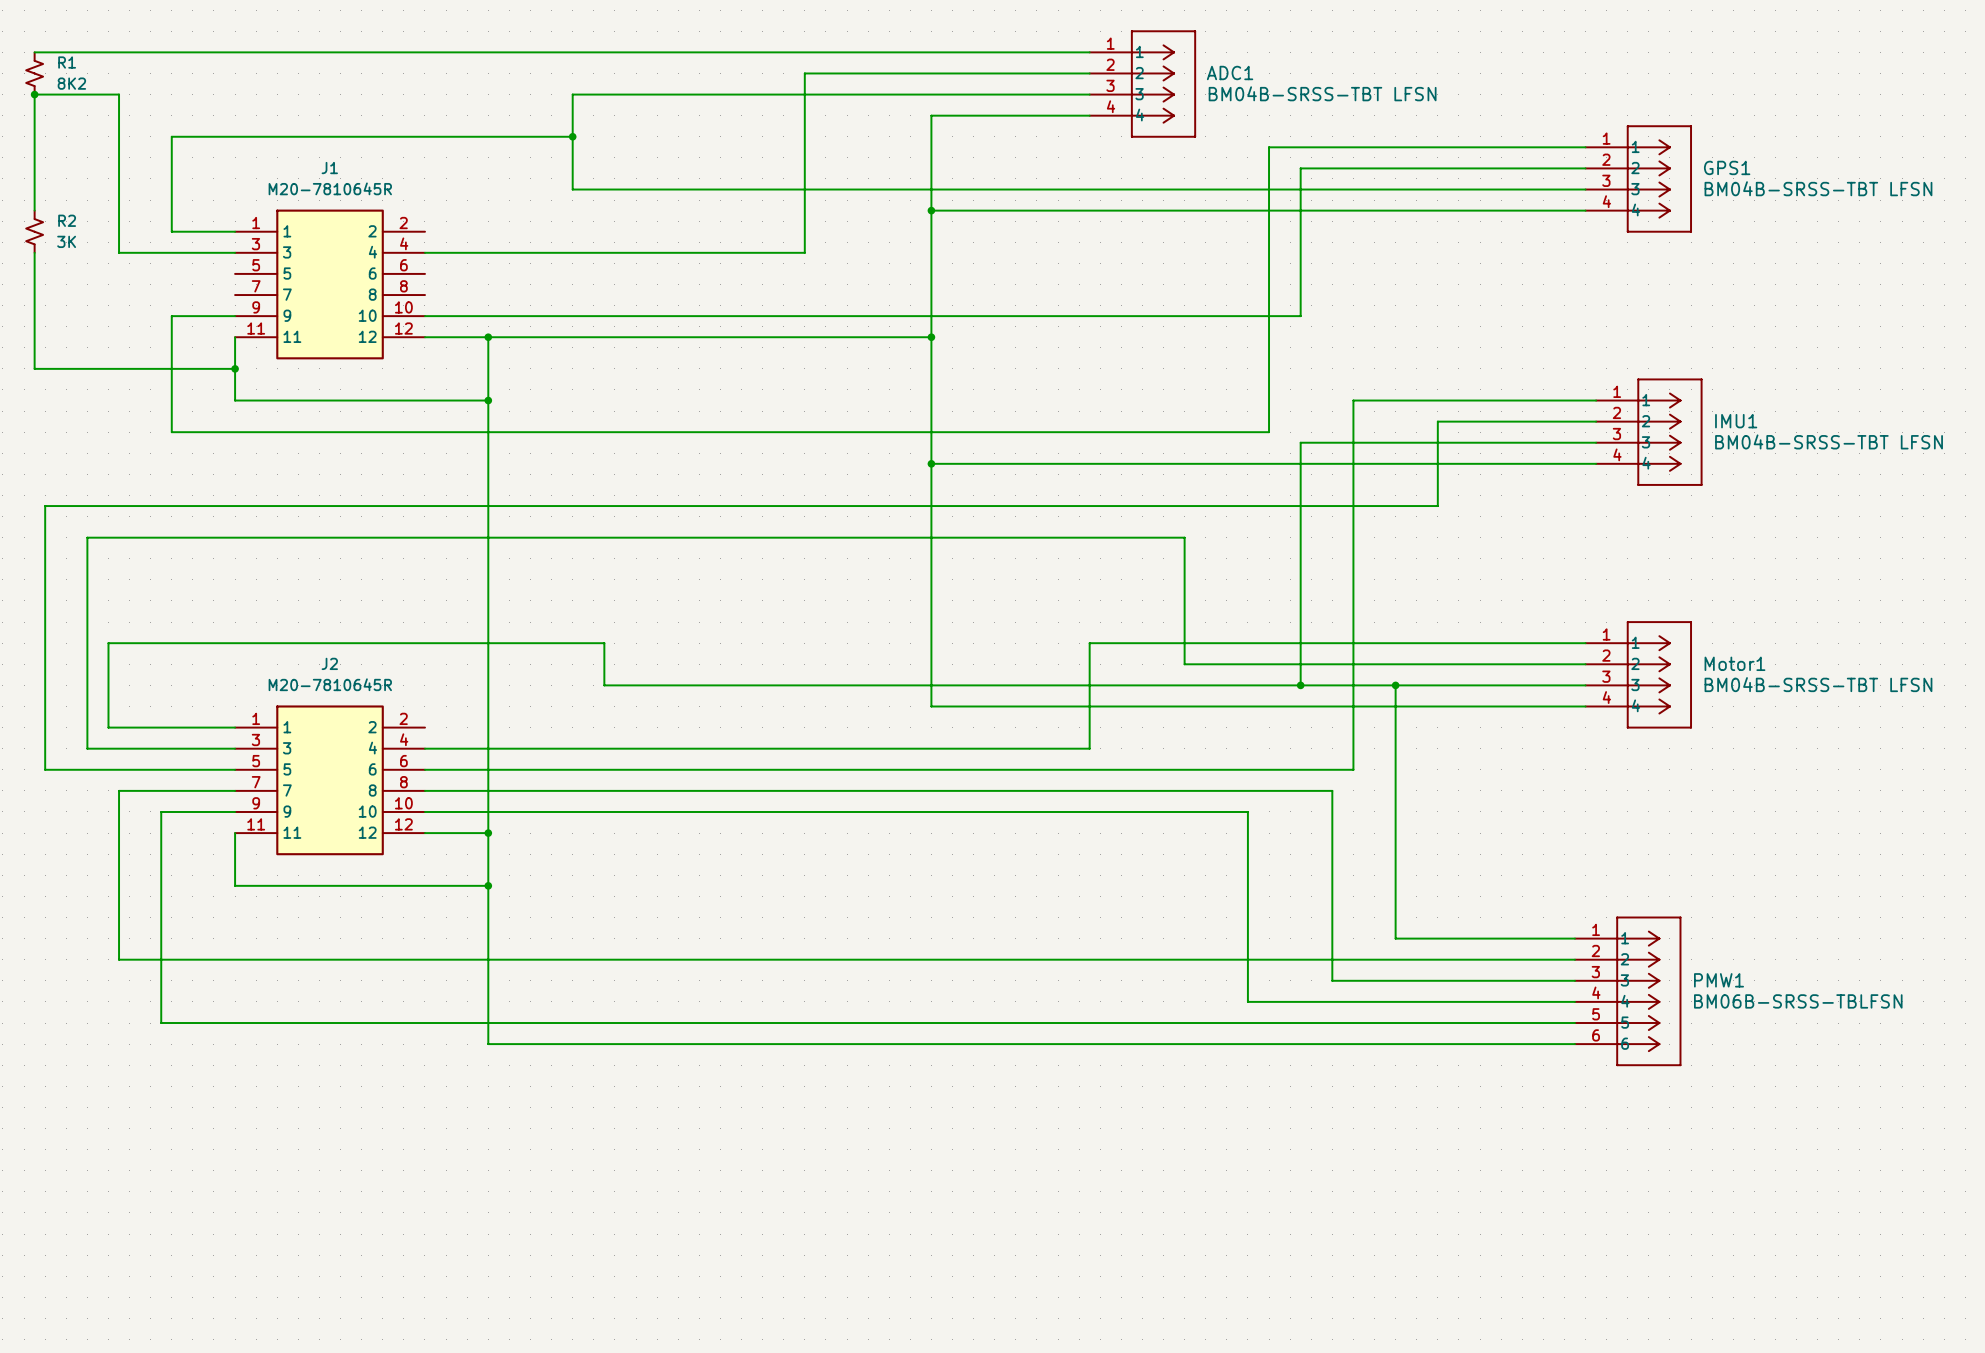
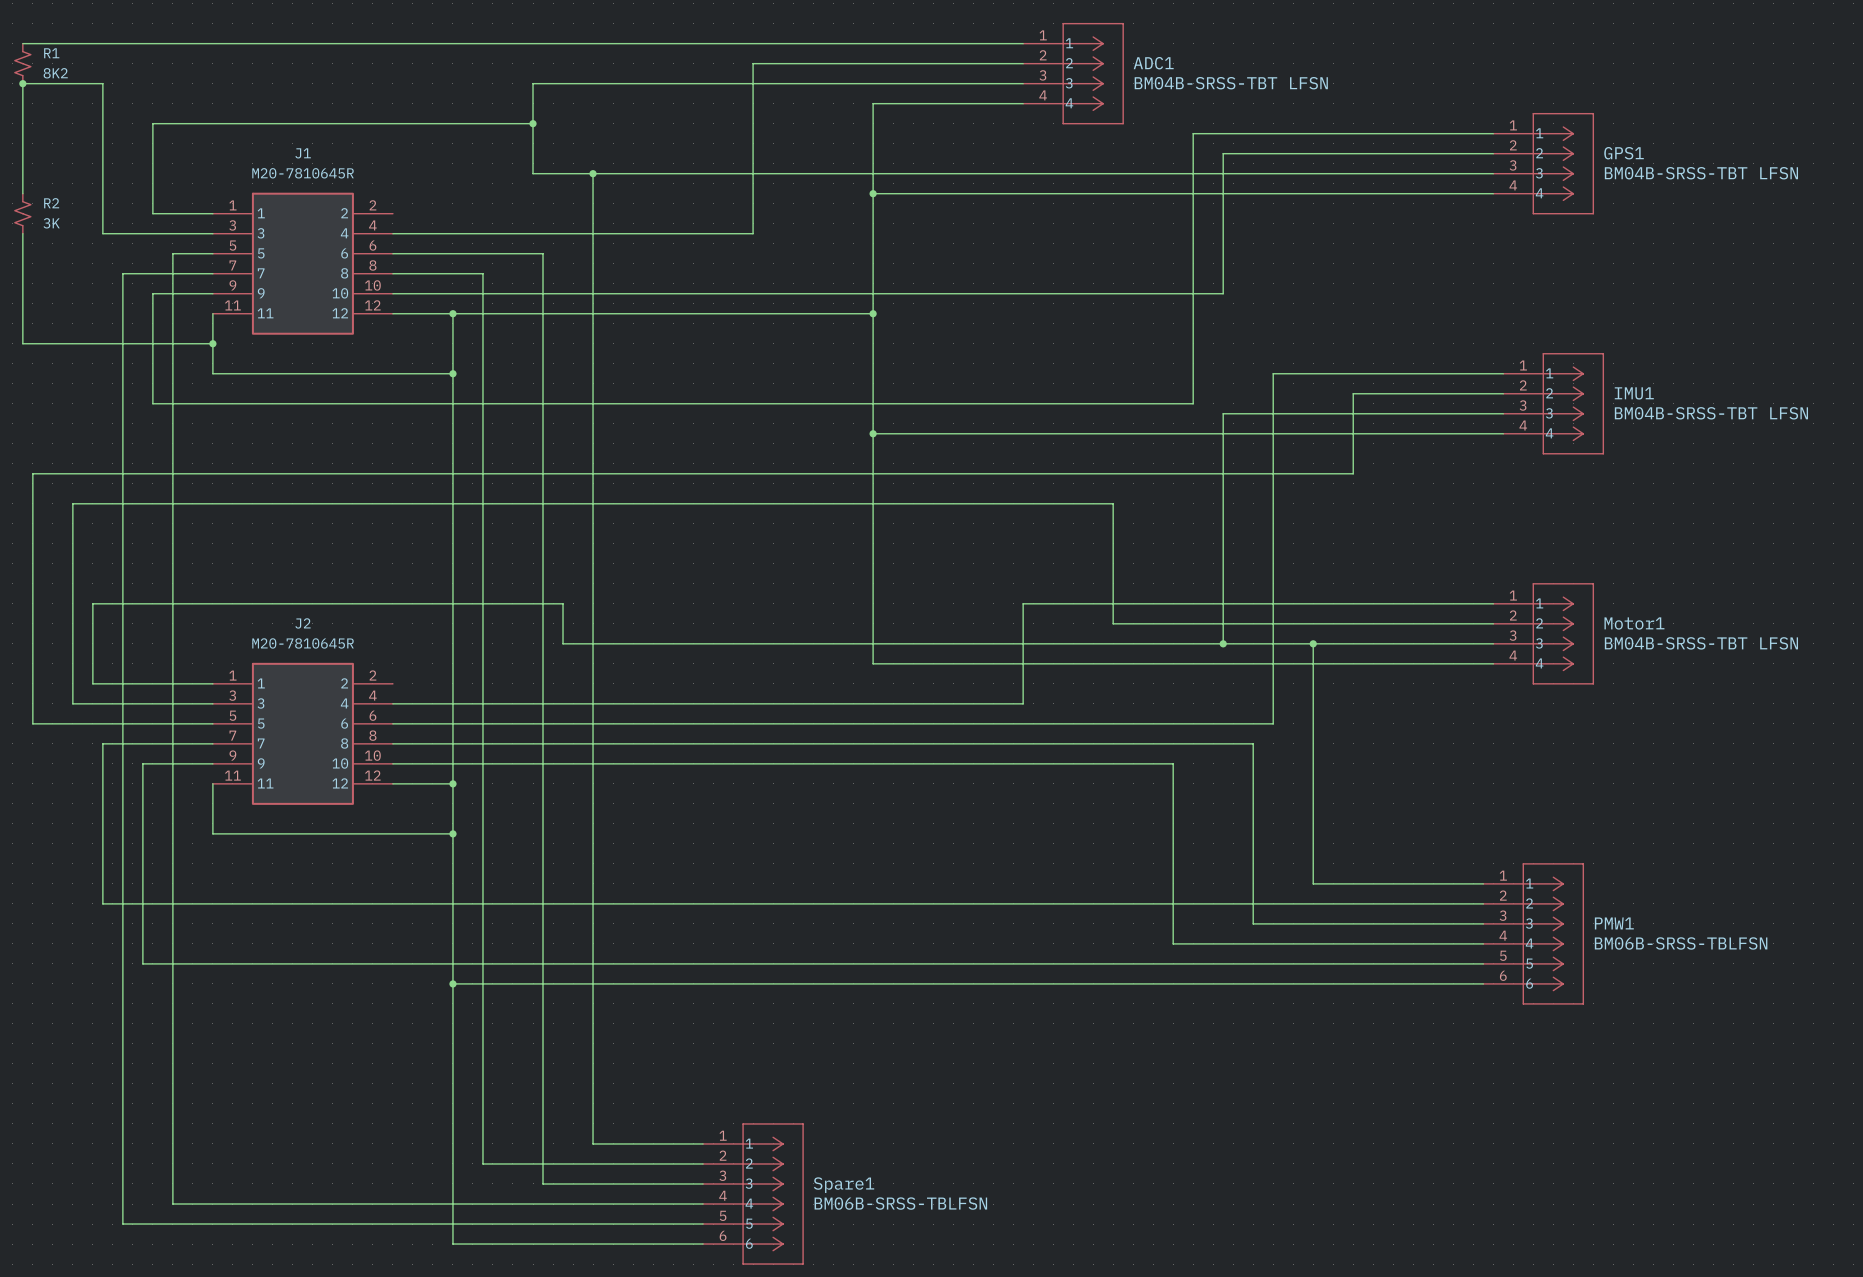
wire: none -> (593, 173) (593, 1143) (703, 1143)
junction: none -> (593, 173)
wire: none -> (212, 253) (172, 253) (172, 1204) (703, 1204)
wire: none -> (392, 253) (543, 253) (543, 1183) (703, 1183)
wire: none -> (212, 273) (122, 273) (122, 1224) (703, 1224)
wire: none -> (392, 273) (482, 273) (482, 1163) (703, 1163)
wire: none -> (452, 983) (452, 1244) (703, 1244)
junction: none -> (452, 983)
Spare1: none -> BM06B-SRSS-TBLFSN (753, 1194)

